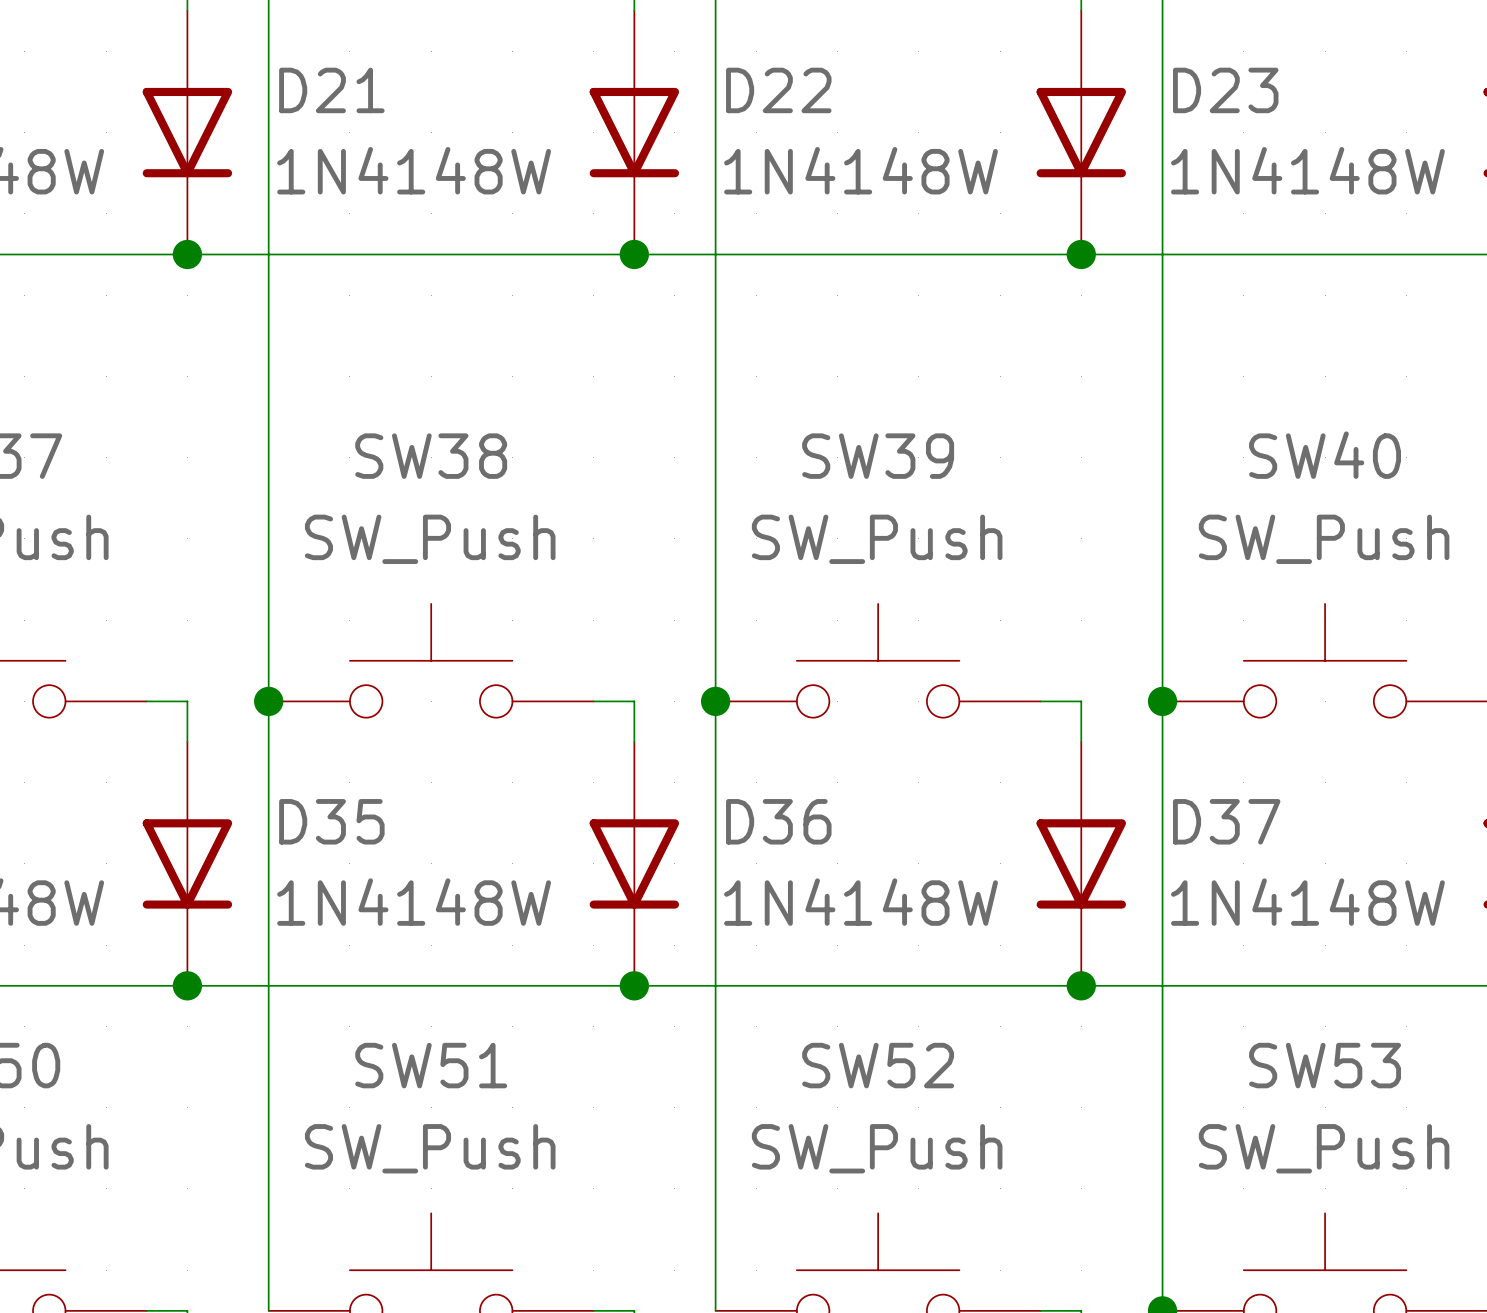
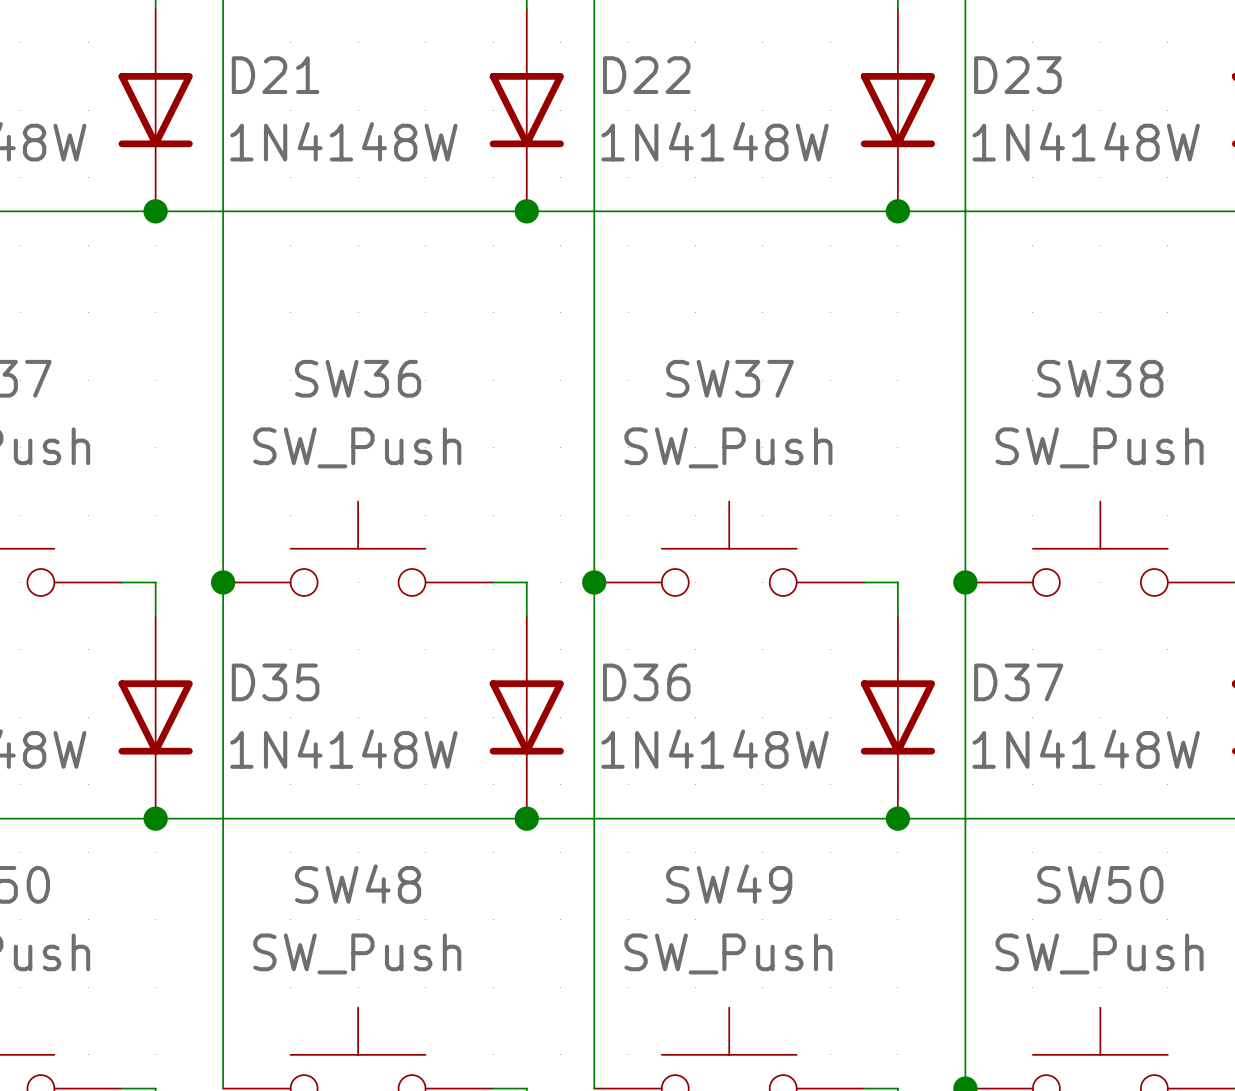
SW40 name: SW40 (1325, 455) -> SW38 (1100, 378)
SW38 name: SW38 (431, 456) -> SW36 (358, 378)
SW39 name: SW39 (878, 456) -> SW37 (730, 378)
SW51 name: SW51 (431, 1065) -> SW48 (358, 884)
SW52 name: SW52 (878, 1065) -> SW49 (729, 884)
SW53 name: SW53 (1325, 1065) -> SW50 (1100, 884)

